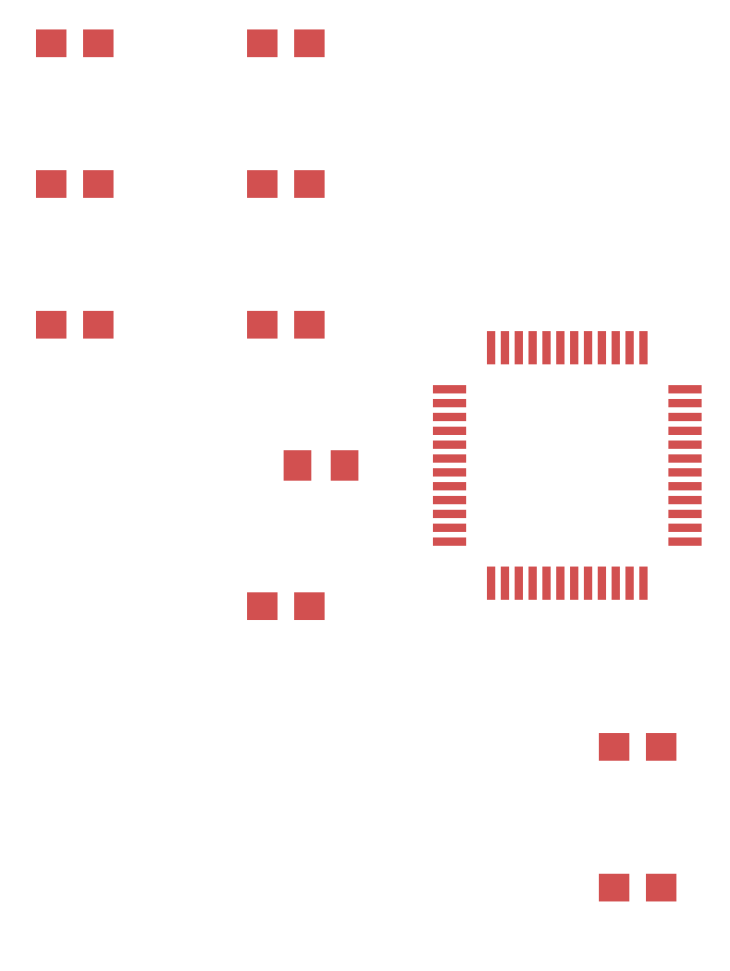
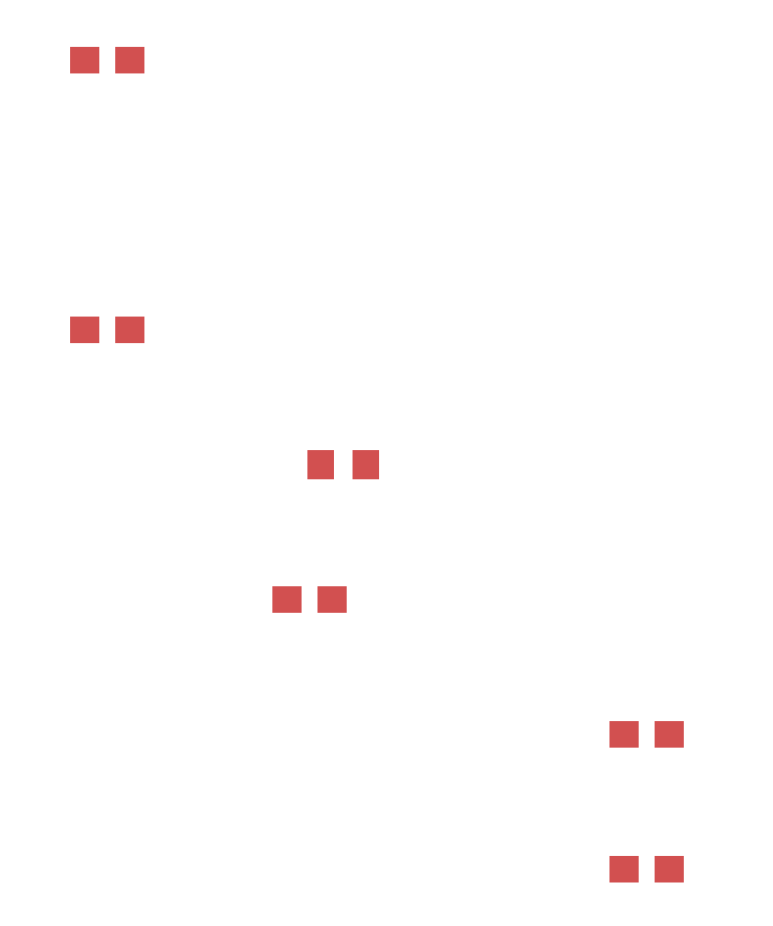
part: (285, 43) -> none
part: (74, 184) -> none
part: (285, 184) -> none
part: (285, 324) -> none
part: (567, 465) -> none

